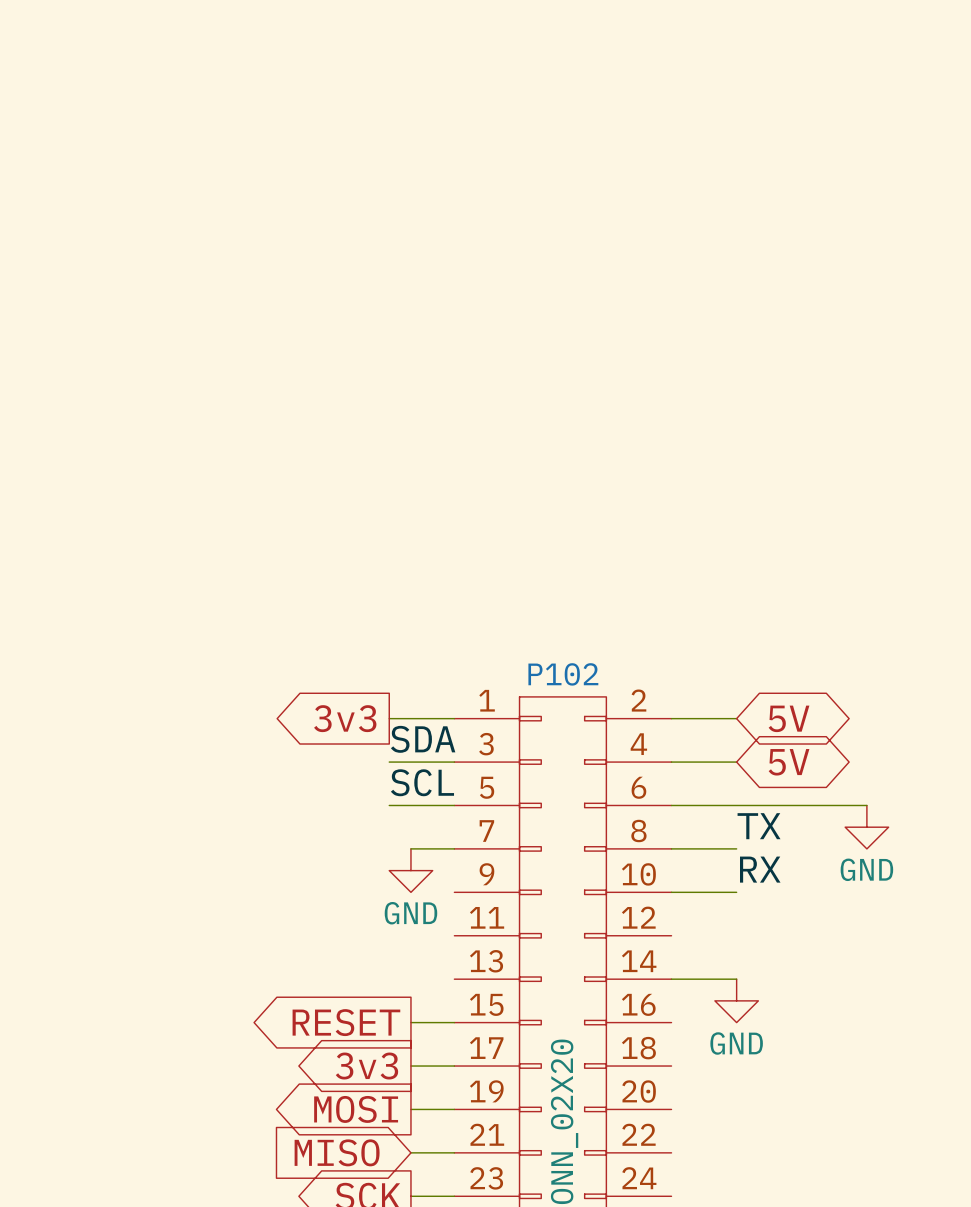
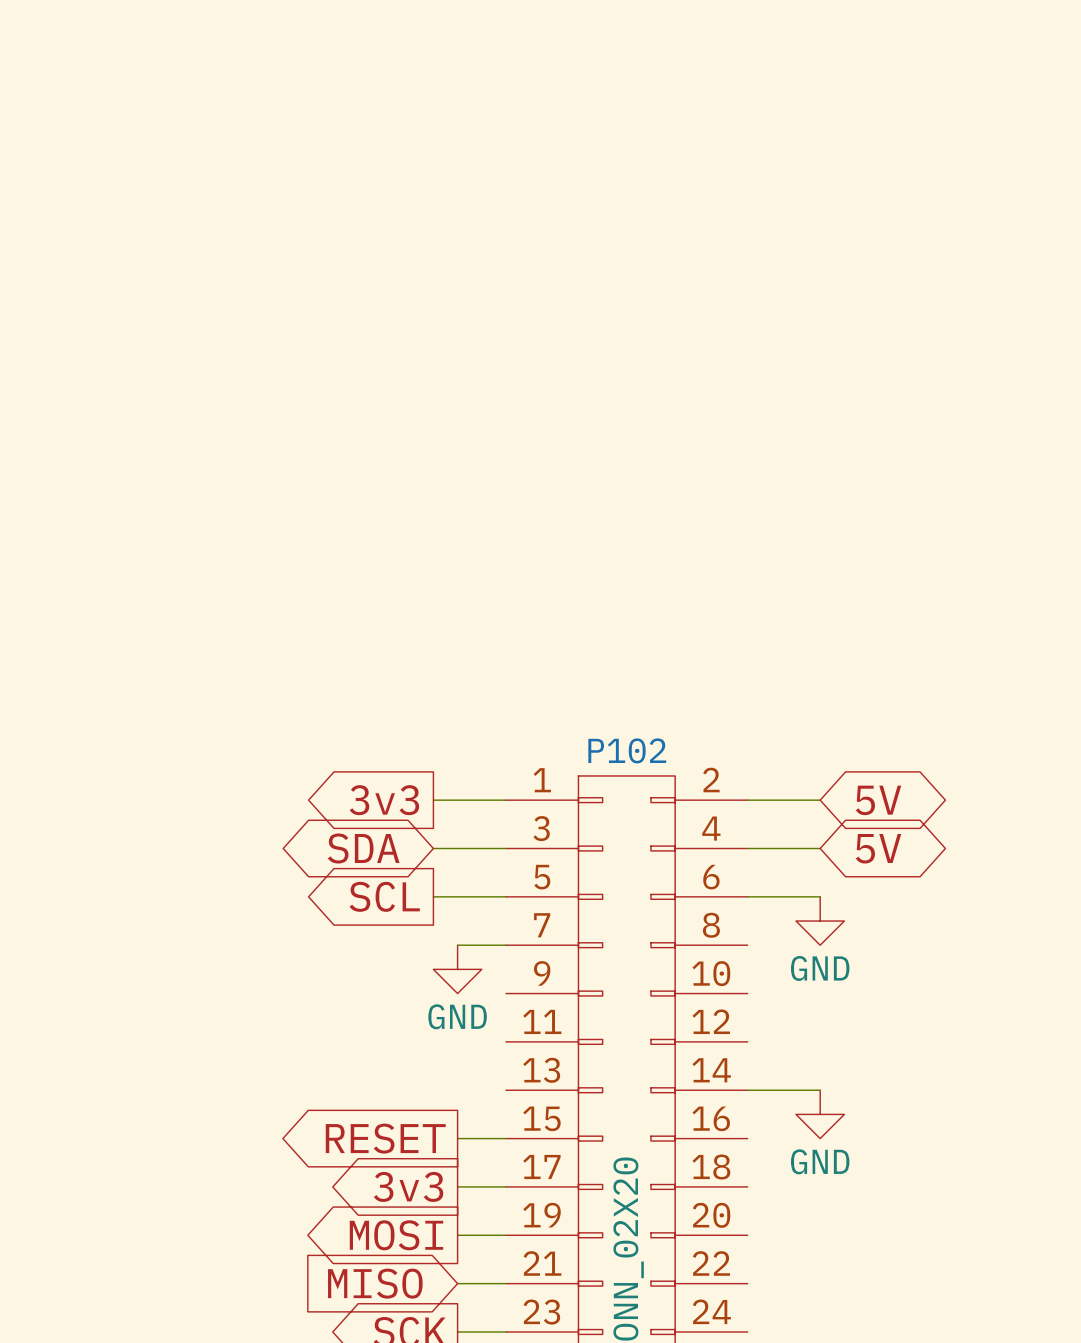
label: SDA (423, 739) -> none
global label: none -> SDA (363, 848)
label: SCL (422, 782) -> none
global label: none -> SCL (384, 896)
wire: (736, 805) (866, 805) -> none
label: TX (759, 826) -> none
power symbol position: GND (866, 827) -> GND (820, 921)
wire: (671, 848) (736, 848) -> none
label: RX (760, 869) -> none
wire: (671, 892) (736, 892) -> none

